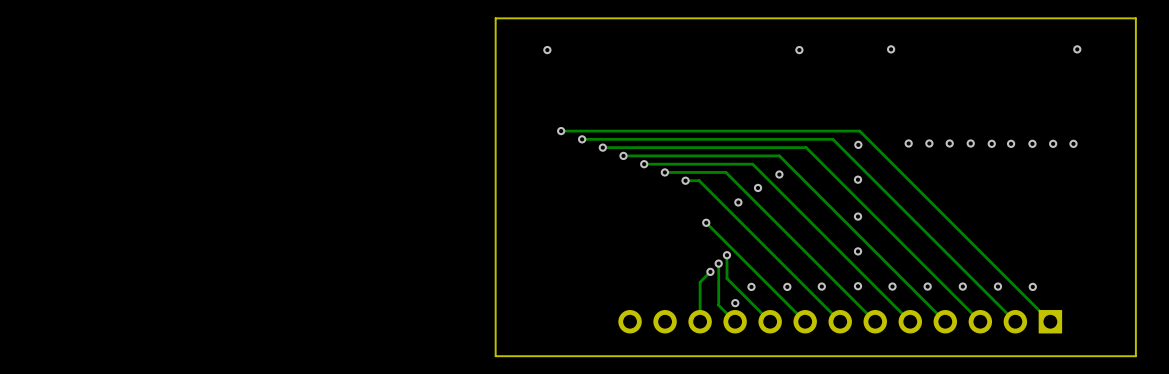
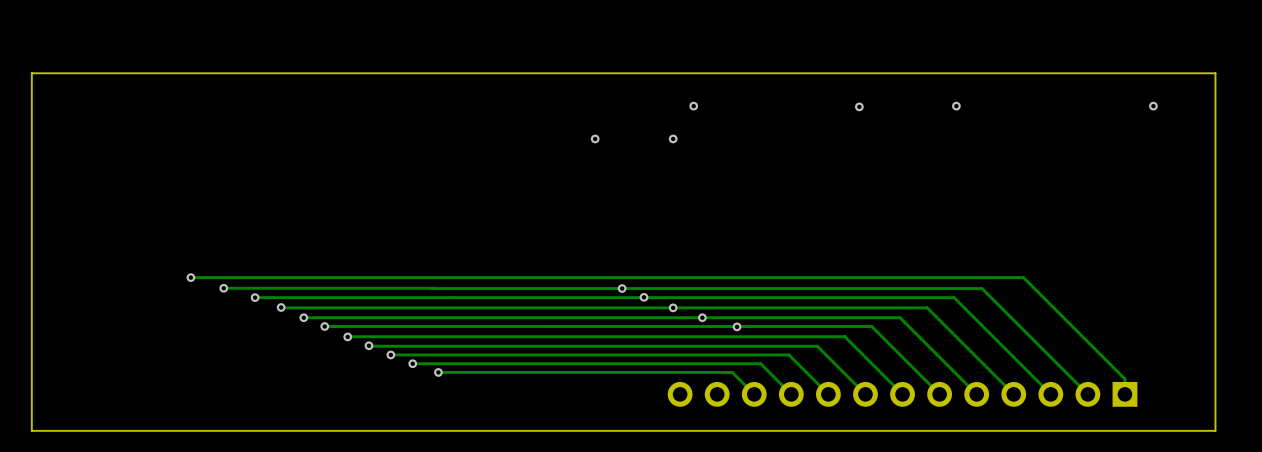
board edge: (495, 18) (495, 356) -> (537, 73) (31, 73) (31, 430) (537, 430)
via: none -> (693, 106)
via: (547, 50) -> none
via: none -> (595, 138)
via: none -> (673, 138)
track: (561, 131) (859, 131) (1050, 321) -> (190, 277) (1023, 277) (1124, 379) (1124, 394)
via: (561, 131) -> none
track: (582, 139) (832, 139) (915, 221) -> (430, 288) (982, 288)
via: (582, 139) -> none
via: (908, 143) -> none
via: (929, 143) -> none
via: (949, 143) -> none
via: (970, 143) -> none
via: (991, 143) -> none
via: (1011, 143) -> none
via: (1032, 143) -> none
via: (1053, 143) -> none
via: (1073, 143) -> none
via: (858, 144) -> none
track: (602, 147) (806, 147) (888, 230) -> (453, 297) (954, 297)
via: (602, 147) -> none
track: (623, 155) (779, 155) (863, 239) -> (281, 307) (927, 307)
via: (623, 155) -> none
track: (644, 164) (752, 164) (837, 249) -> (303, 316) (900, 317)
via: (644, 164) -> none
track: (664, 172) (725, 172) (811, 257) -> (546, 326) (871, 326)
via: (664, 172) -> none
via: (779, 174) -> none
via: (858, 179) -> none
track: (685, 180) (699, 180) (785, 267) -> (347, 336) (844, 336)
via: (685, 180) -> none
via: (758, 187) -> none
via: (738, 202) -> none
via: none -> (190, 277)
via: (858, 216) -> none
via: none -> (223, 288)
track: none -> (436, 288) (223, 288)
via: none -> (622, 288)
track: (706, 222) (759, 276) -> (368, 345) (817, 346)
via: (706, 222) -> none
via: none -> (255, 297)
track: none -> (452, 297) (255, 297)
via: none -> (643, 297)
via: none -> (281, 307)
via: none -> (673, 307)
via: none -> (303, 317)
via: none -> (702, 317)
via: (858, 251) -> none
track: (726, 255) (726, 278) (732, 284) -> (390, 354) (789, 354)
via: (726, 255) -> none
via: none -> (324, 326)
track: none -> (545, 326) (324, 326)
via: none -> (737, 326)
track: (718, 263) (718, 305) -> (412, 363) (760, 363) (773, 376)
via: (718, 263) -> none
via: none -> (347, 336)
track: (710, 271) (700, 282) (700, 321) -> (438, 372) (732, 372) (754, 394)
via: (710, 271) -> none
via: none -> (368, 345)
via: none -> (390, 354)
via: (751, 286) -> none
via: (787, 286) -> none
via: (821, 286) -> none
via: (858, 286) -> none
via: (892, 286) -> none
via: (927, 286) -> none
via: (962, 286) -> none
via: (997, 286) -> none
via: (1032, 286) -> none
via: none -> (412, 363)
via: none -> (438, 372)
via: (735, 303) -> none

